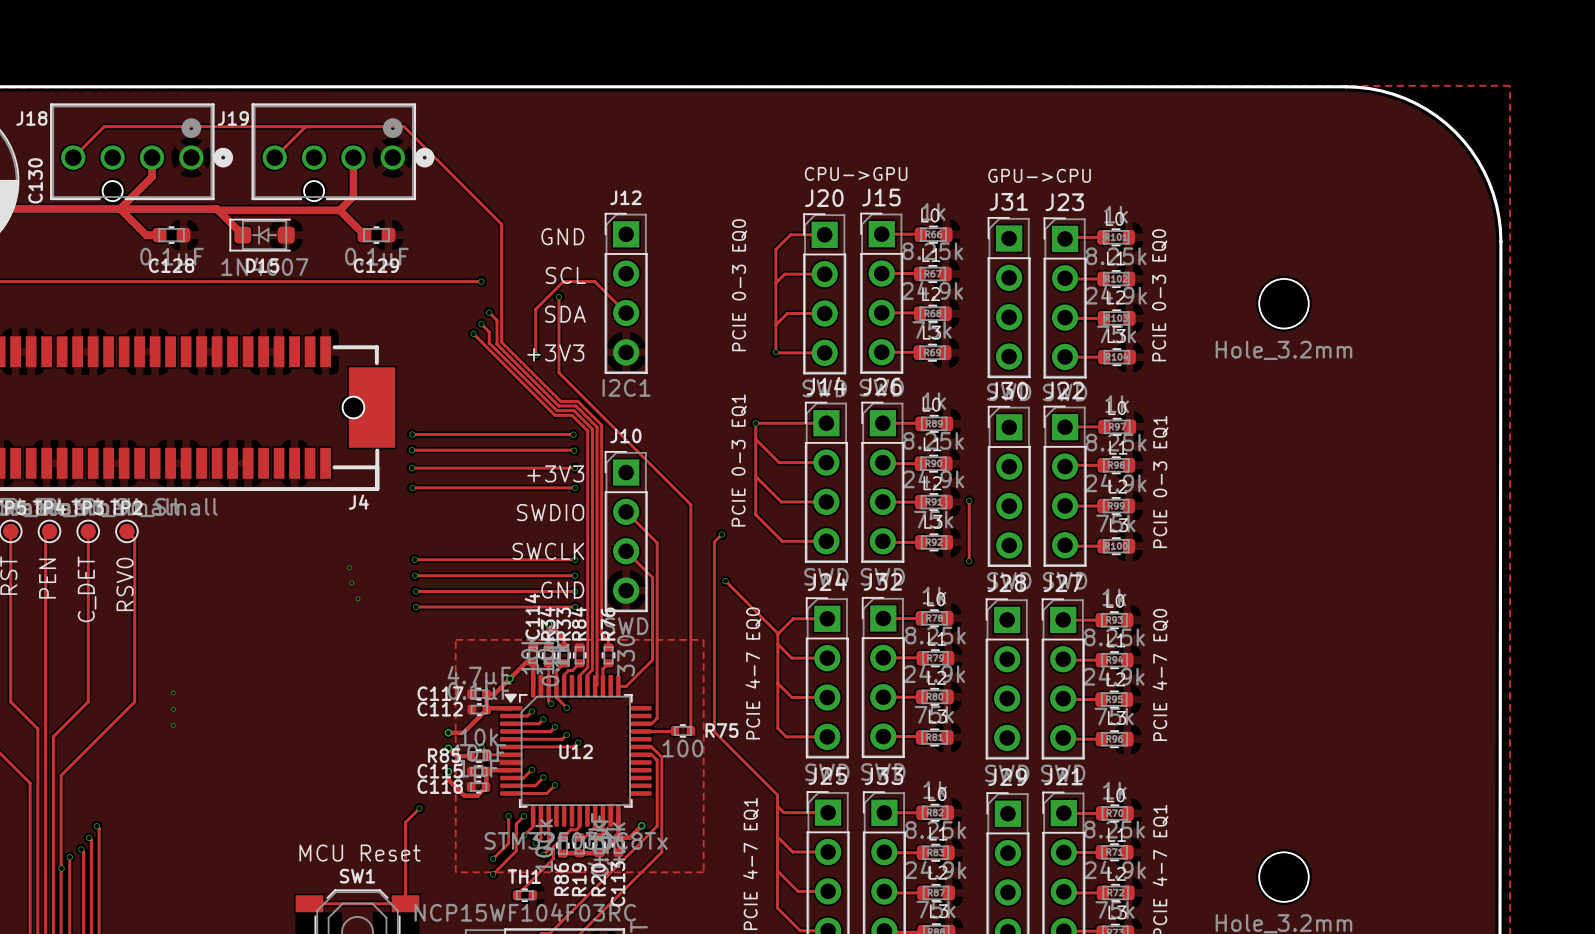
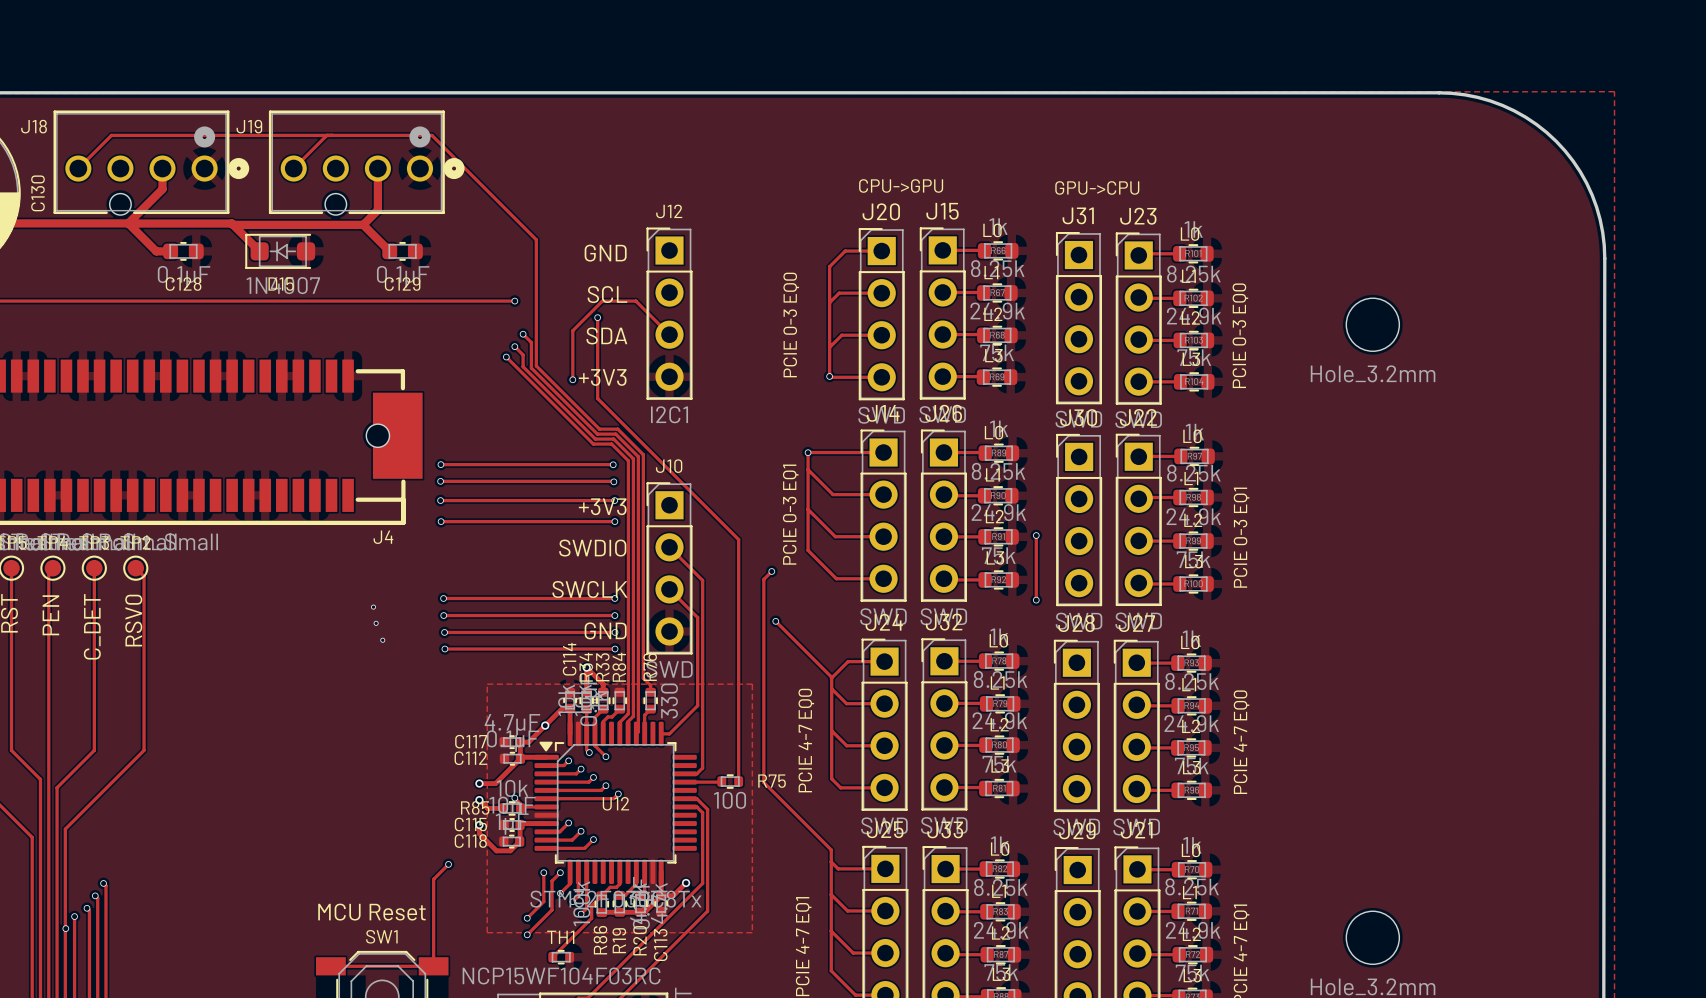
via: (173, 693) -> none
via: (173, 709) -> none
via: (173, 725) -> none

